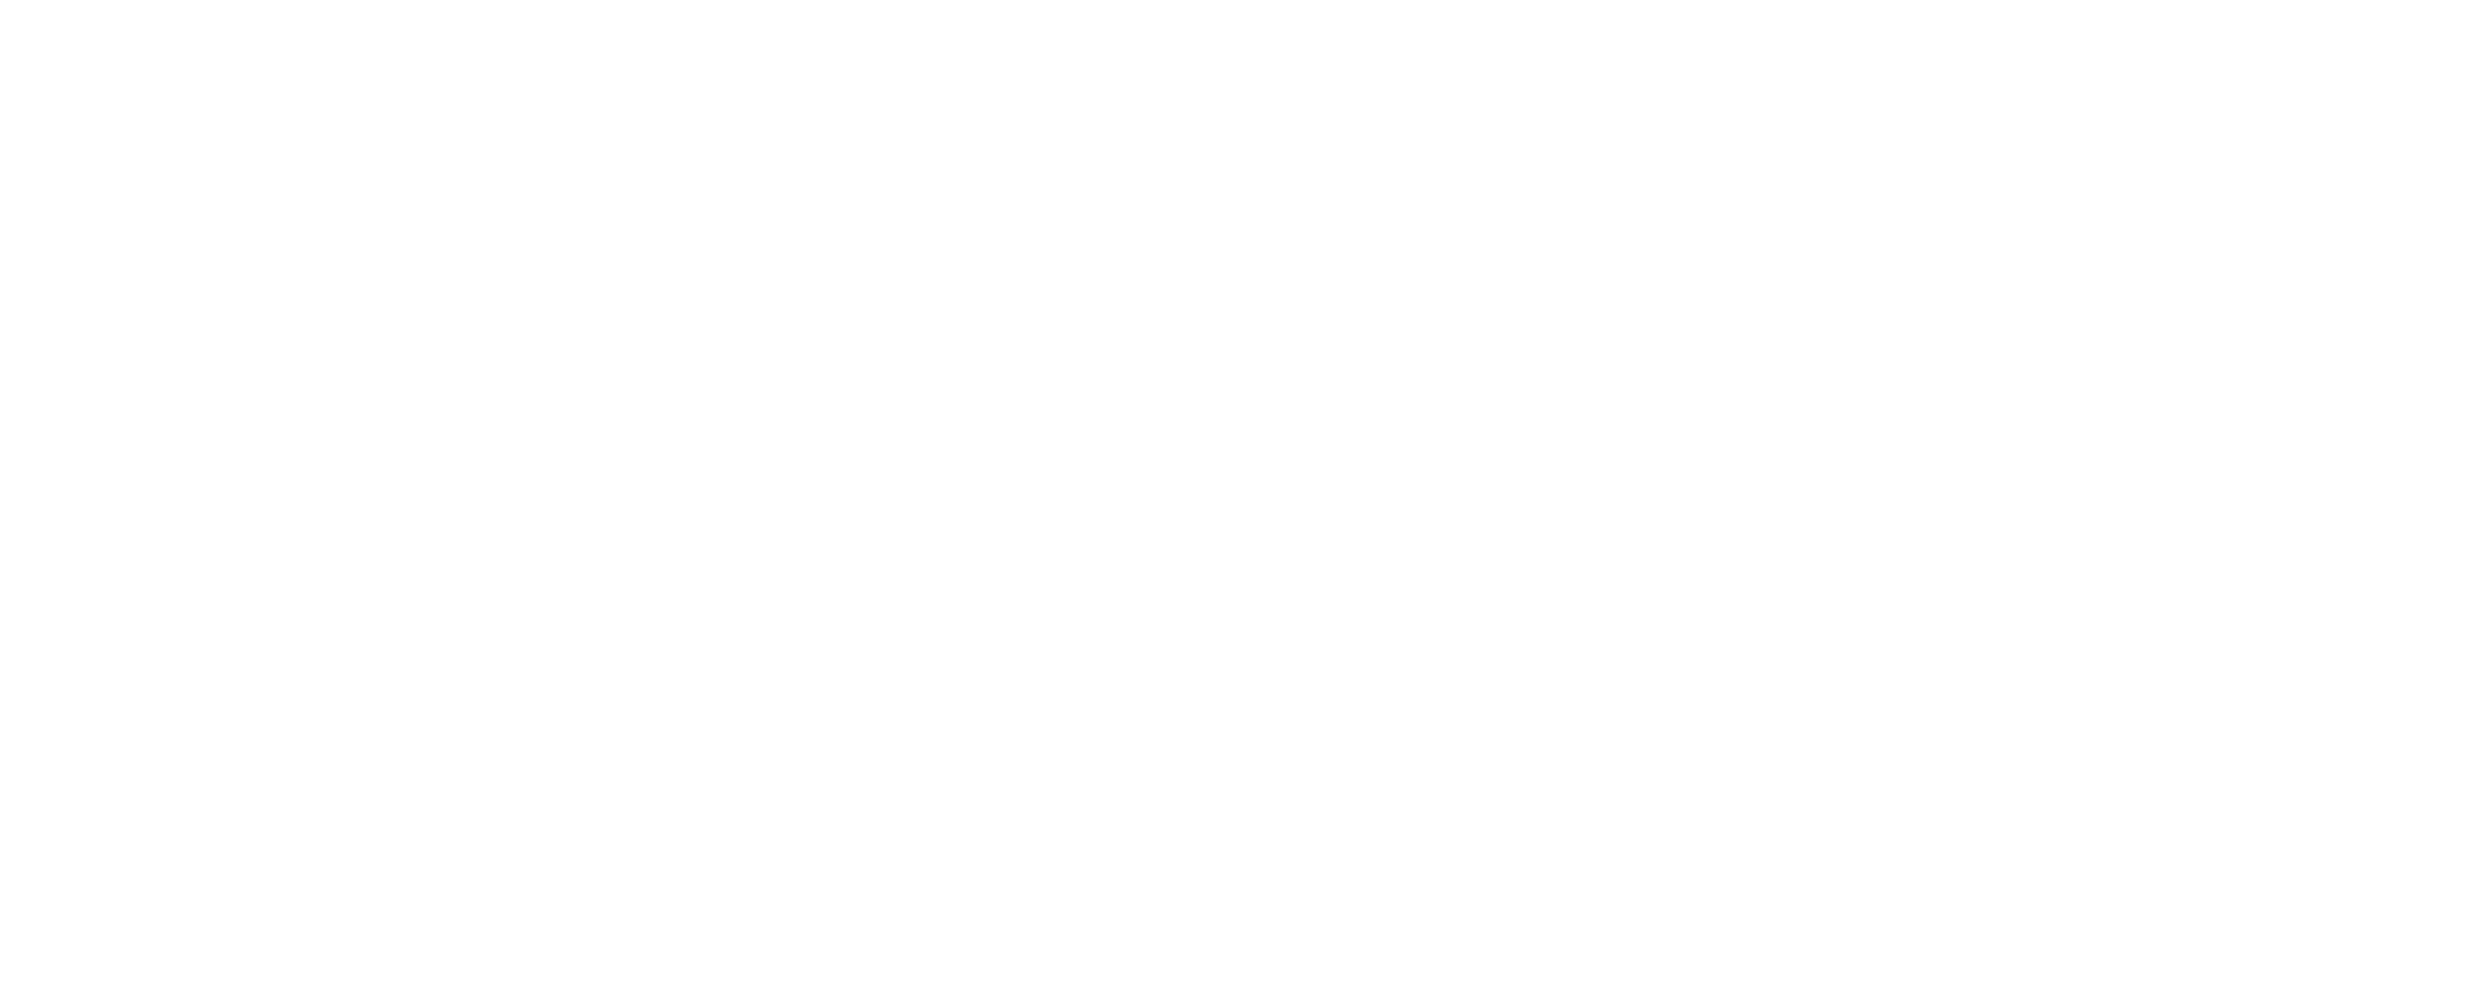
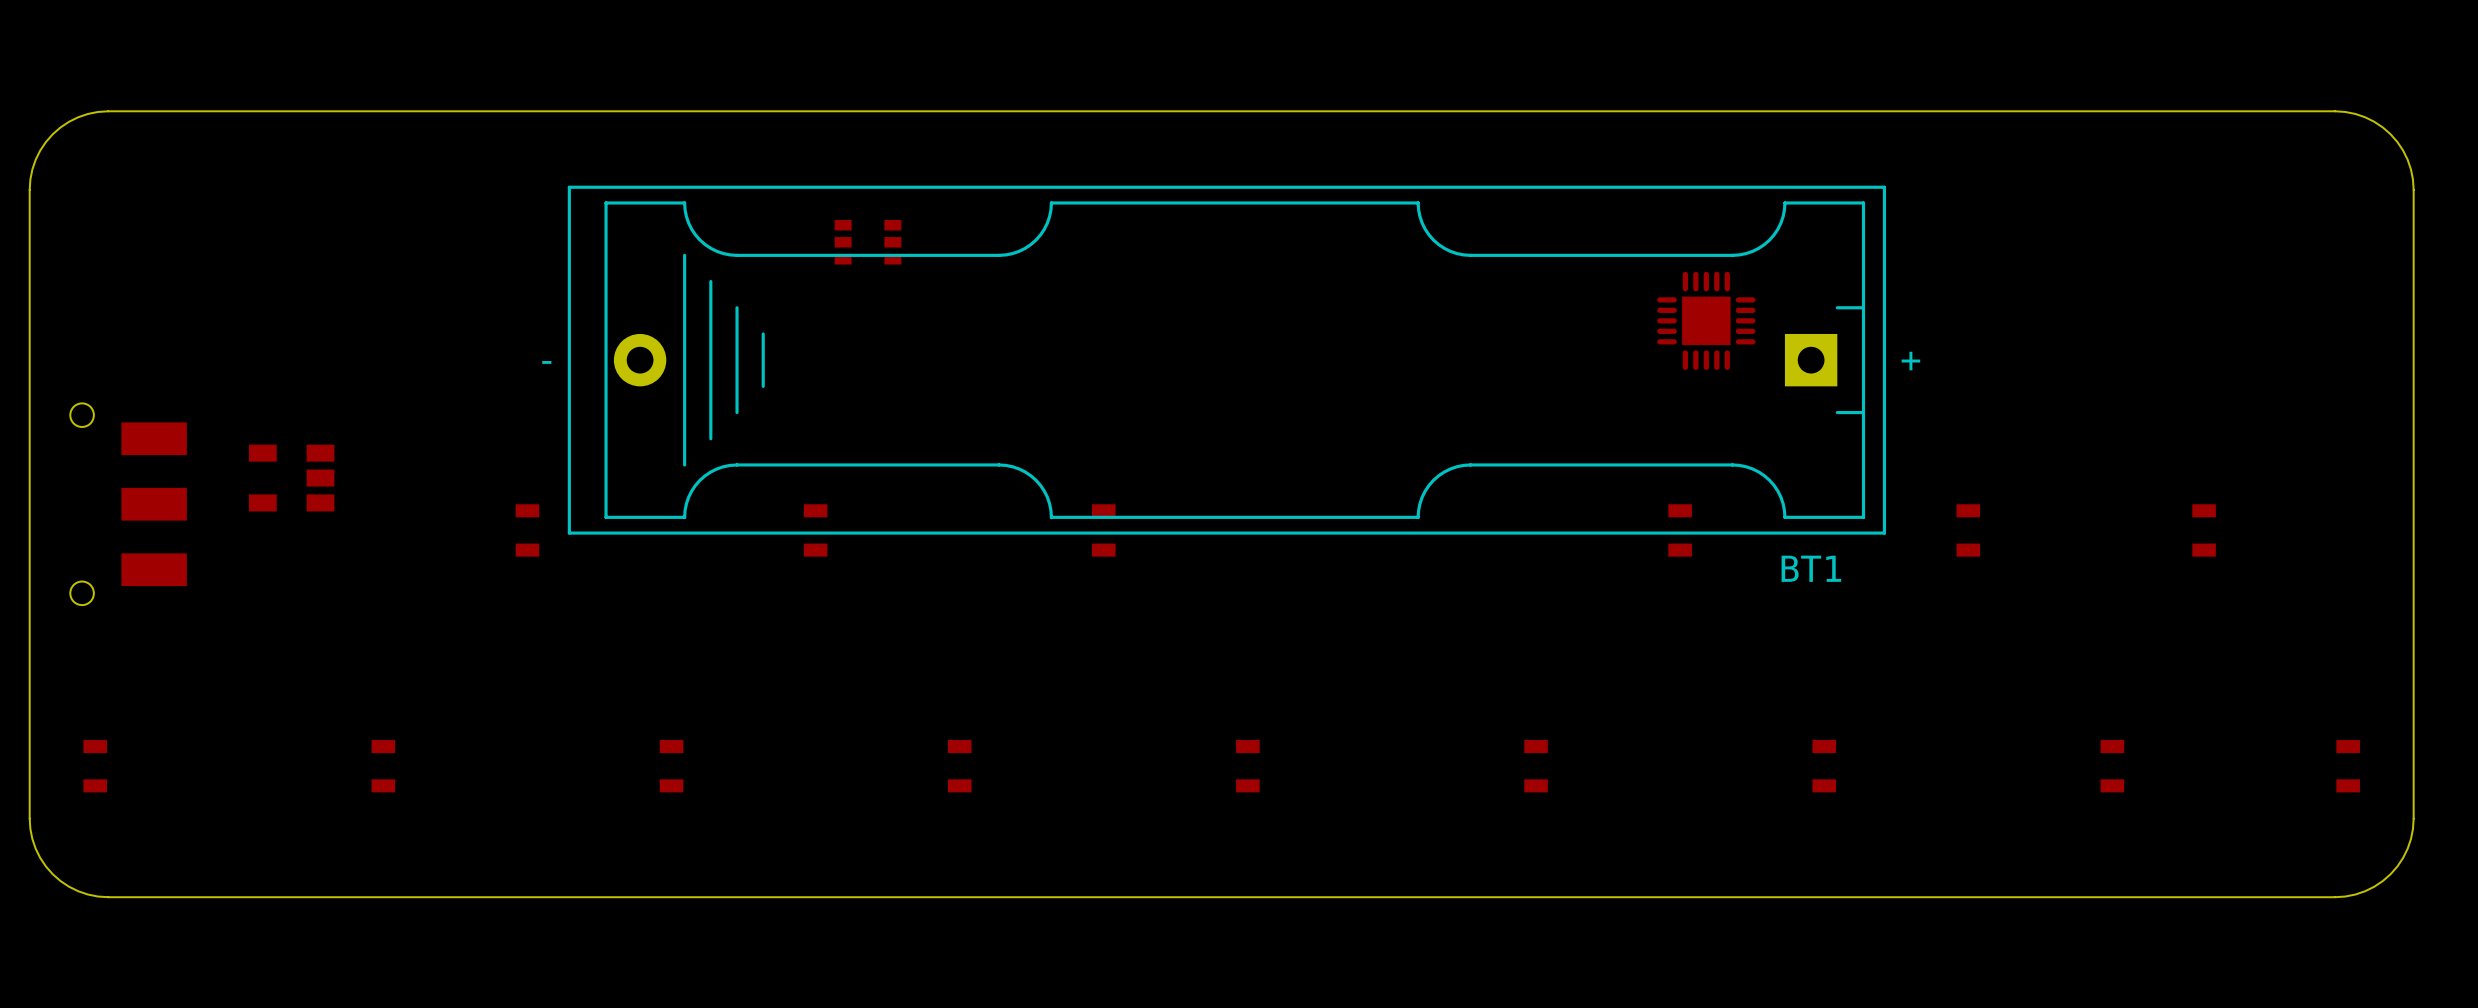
board edge: none -> (2335, 111) (108, 111) (87, 113) (68, 121) (45, 142) (35, 159) (30, 179) (29, 818) (32, 838) (45, 866) (60, 880) (78, 891) (108, 897) (2335, 897) (2355, 894) (2382, 880) (2397, 866) (2407, 848) (2412, 828) (2413, 189) (2407, 159) (2390, 134) (2365, 117) (2335, 111)
part: none -> (868, 242)
part: none -> (1706, 320)
BT1: none -> (1226, 360)
part: none -> (291, 478)
part: none -> (128, 504)
part: none -> (527, 530)
part: none -> (815, 530)
part: none -> (1103, 530)
part: none -> (1680, 530)
part: none -> (1968, 530)
part: none -> (2204, 530)
part: none -> (95, 766)
part: none -> (383, 766)
part: none -> (671, 766)
part: none -> (959, 766)
part: none -> (1247, 766)
part: none -> (1536, 766)
part: none -> (1824, 766)
part: none -> (2112, 766)
part: none -> (2348, 766)

